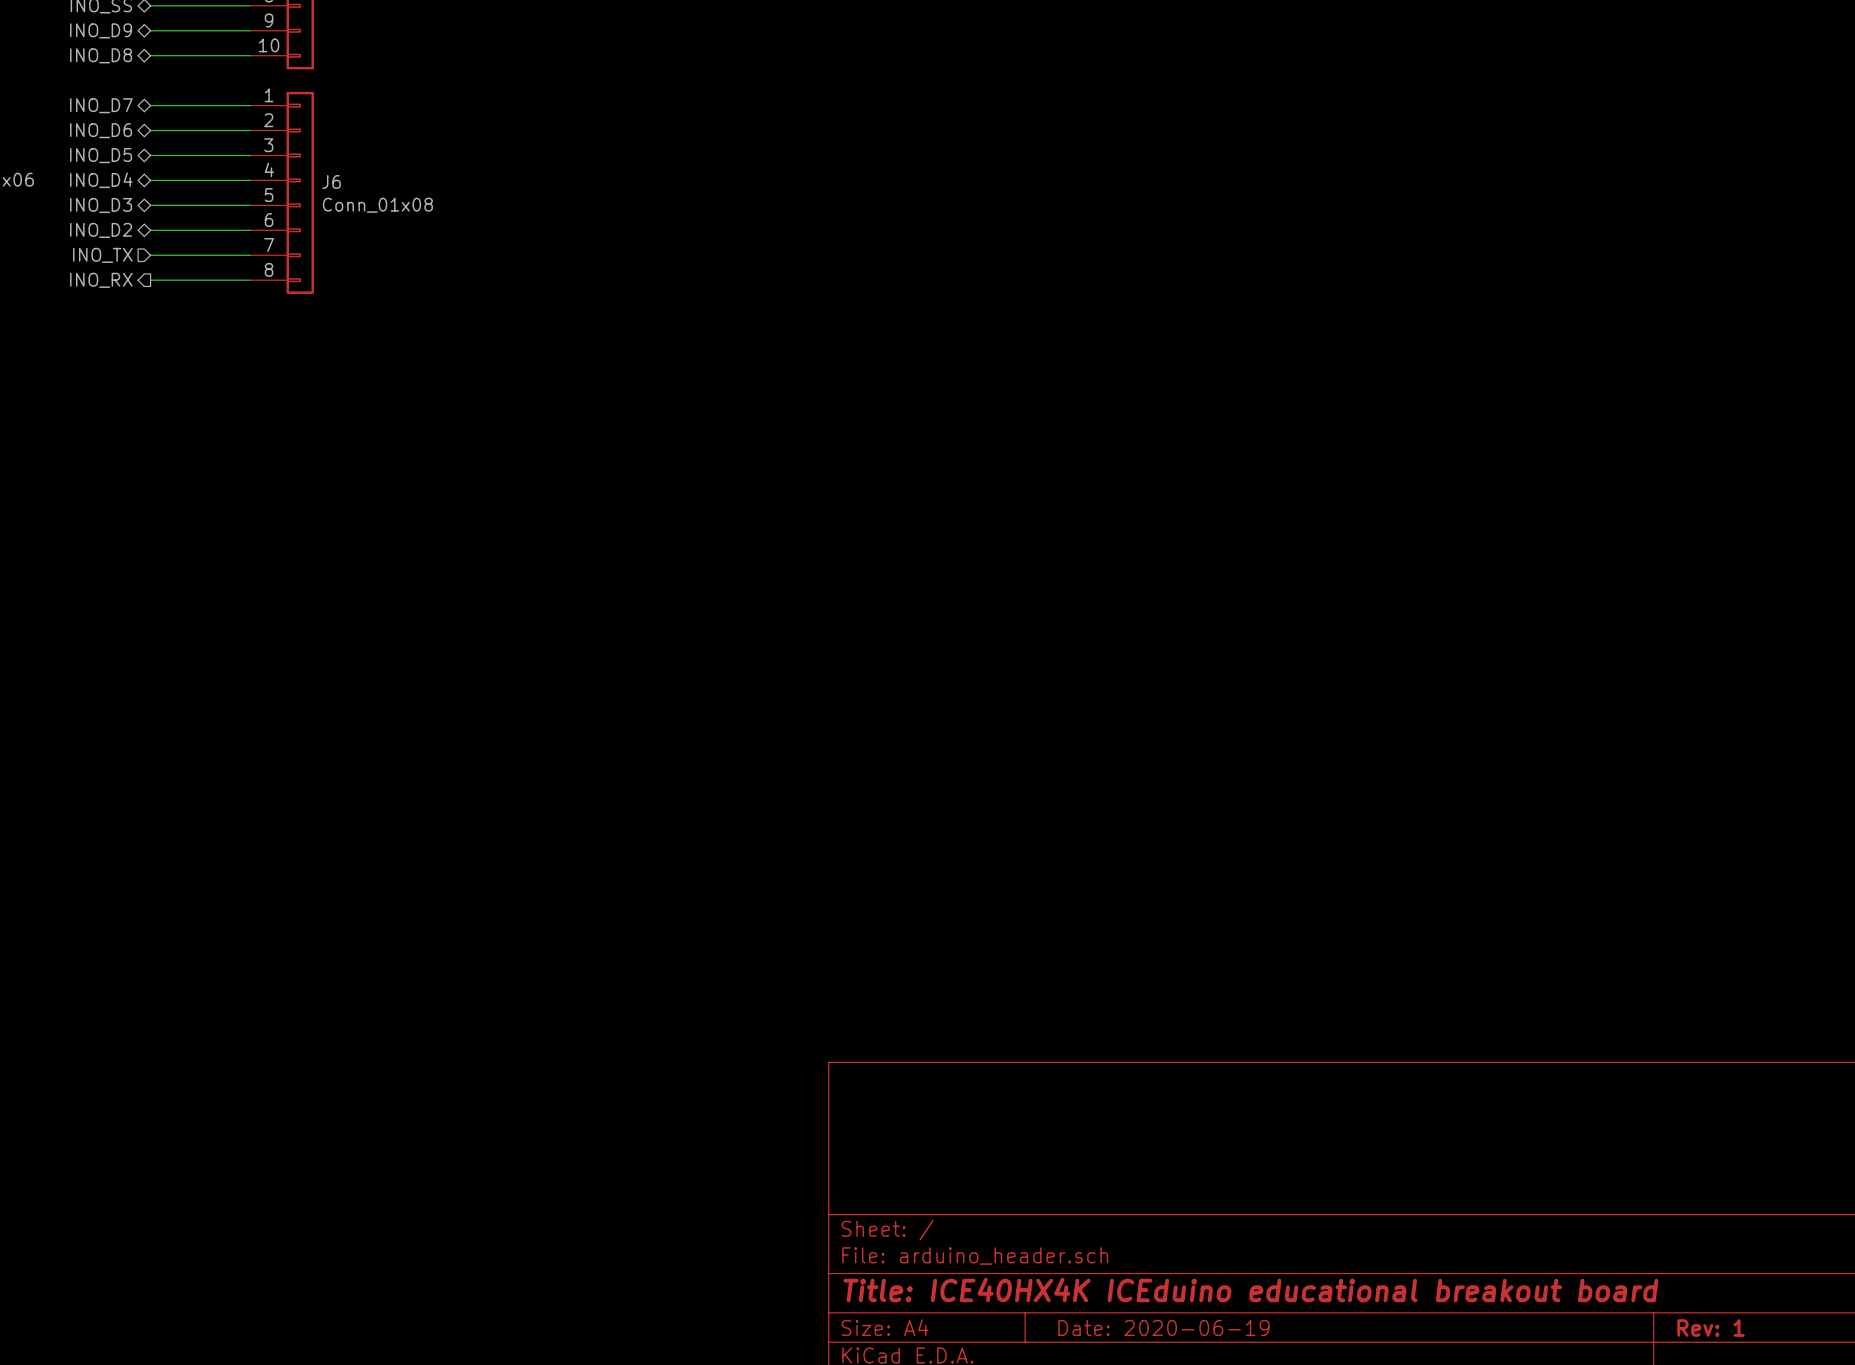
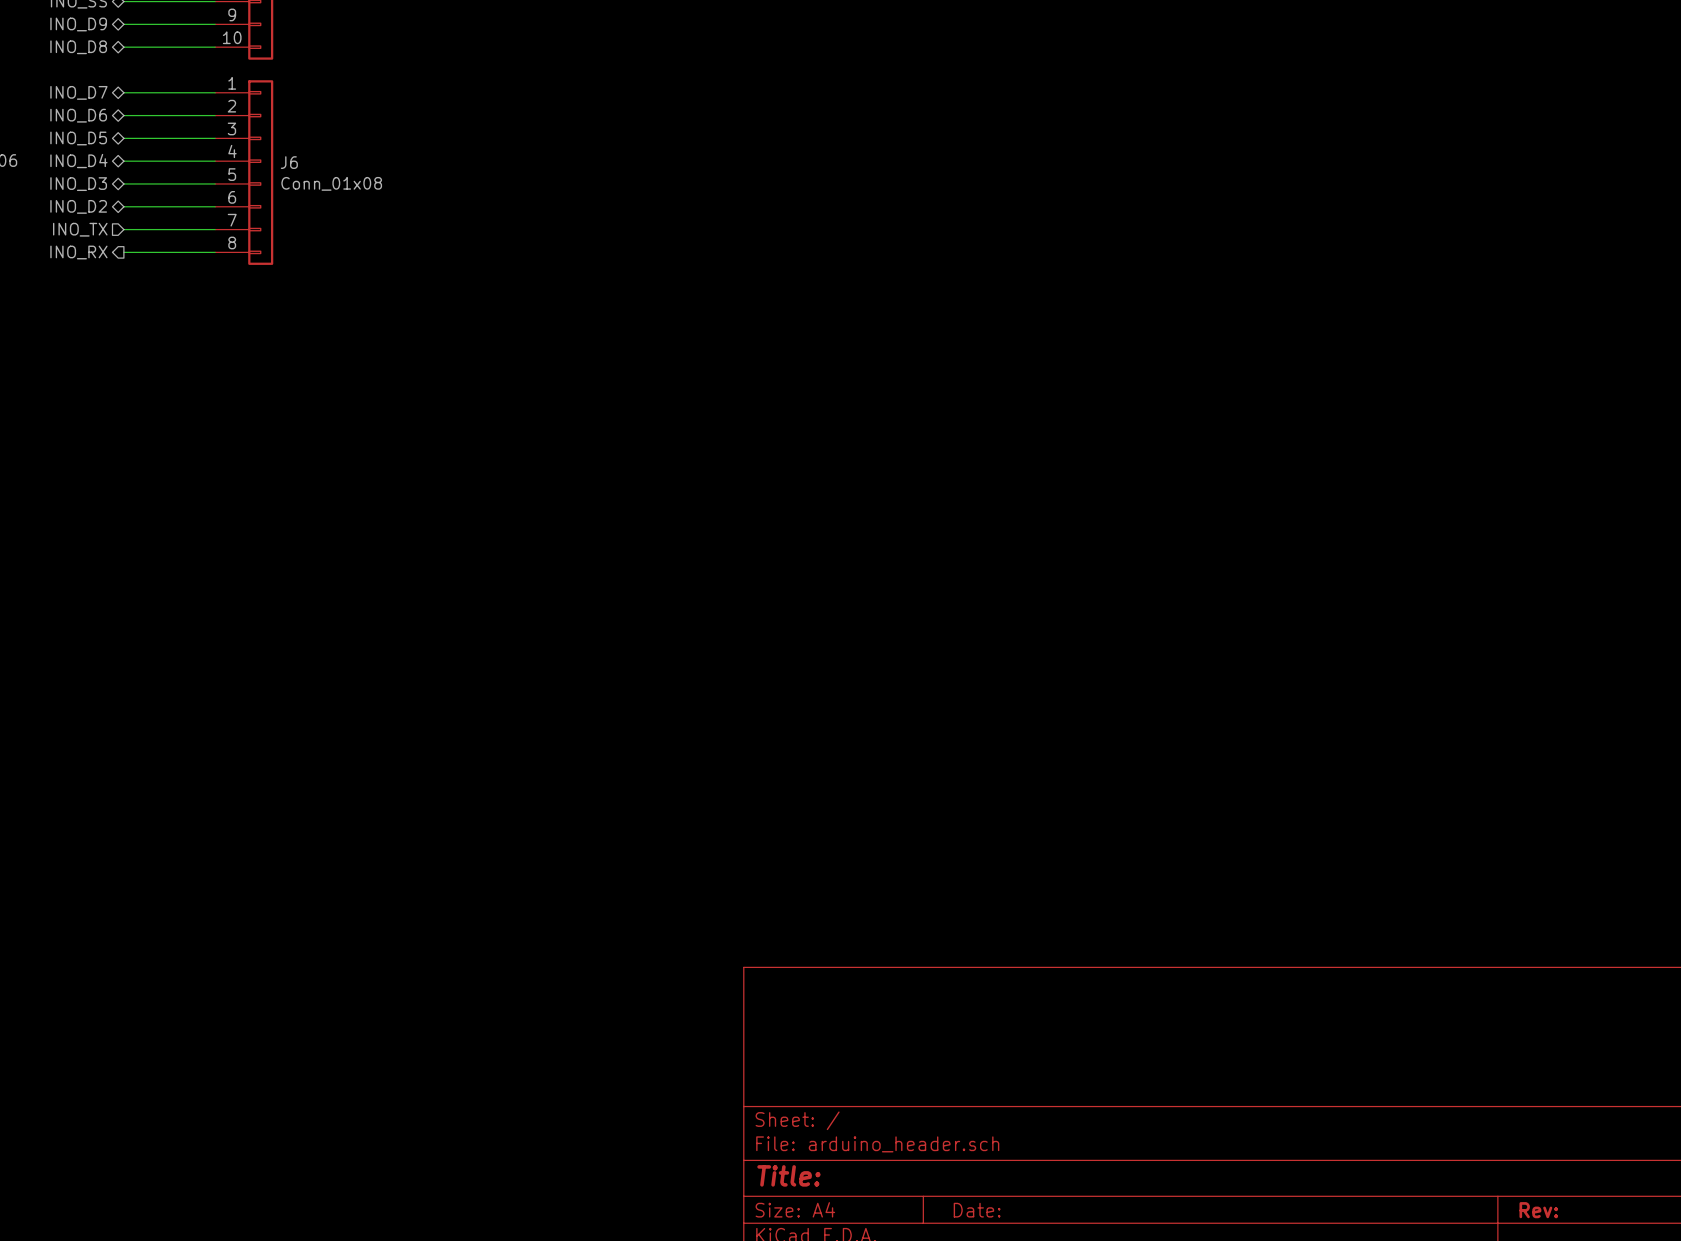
title block: Title: ICE40HX4K ICEduino educational breakout board (1250, 1290) -> Title: (788, 1175)
title block: Date: 2020-06-19 (1163, 1327) -> Date: (977, 1210)
title block: Rev: 1 (1711, 1327) -> Rev: (1538, 1210)

